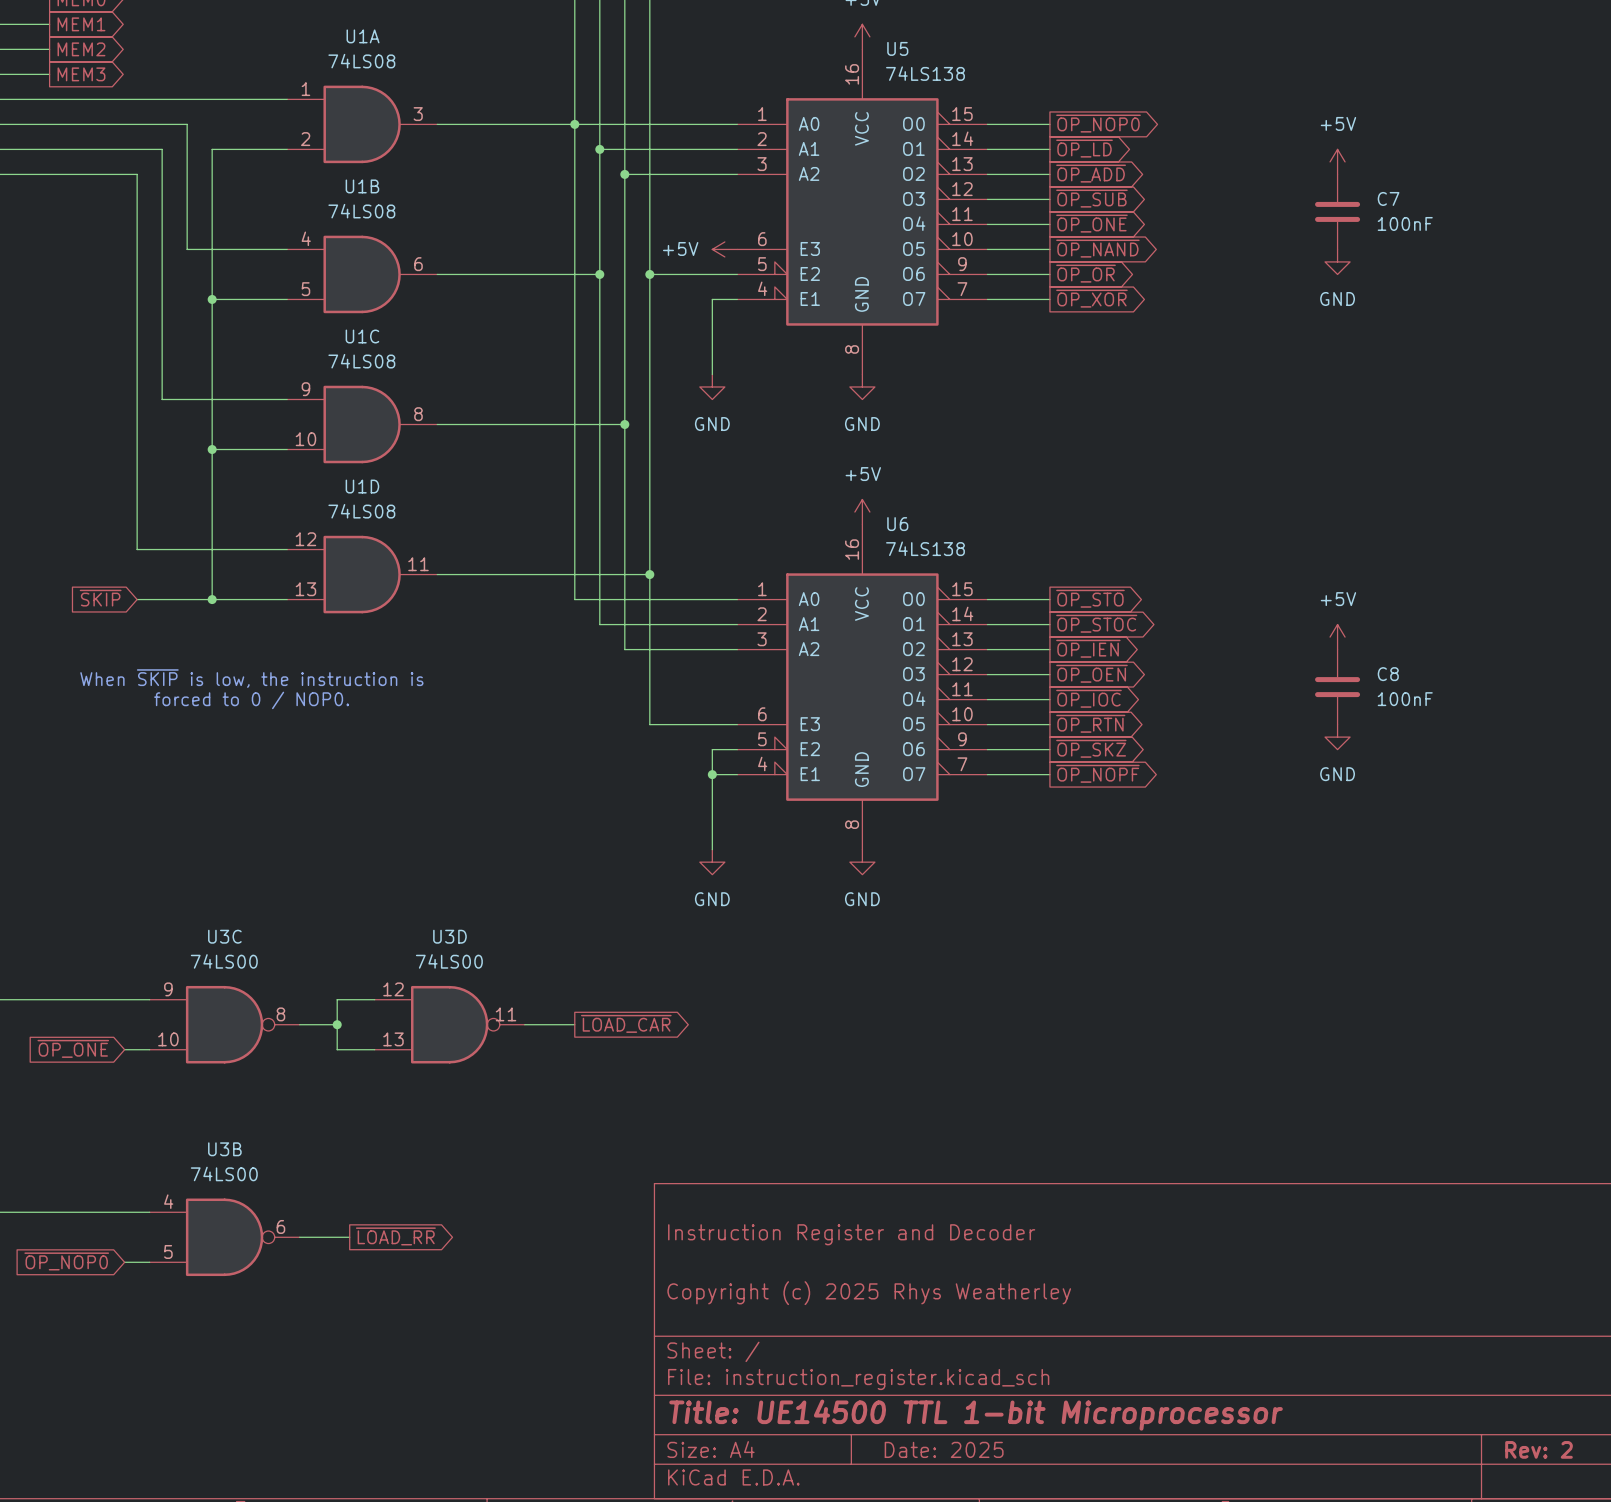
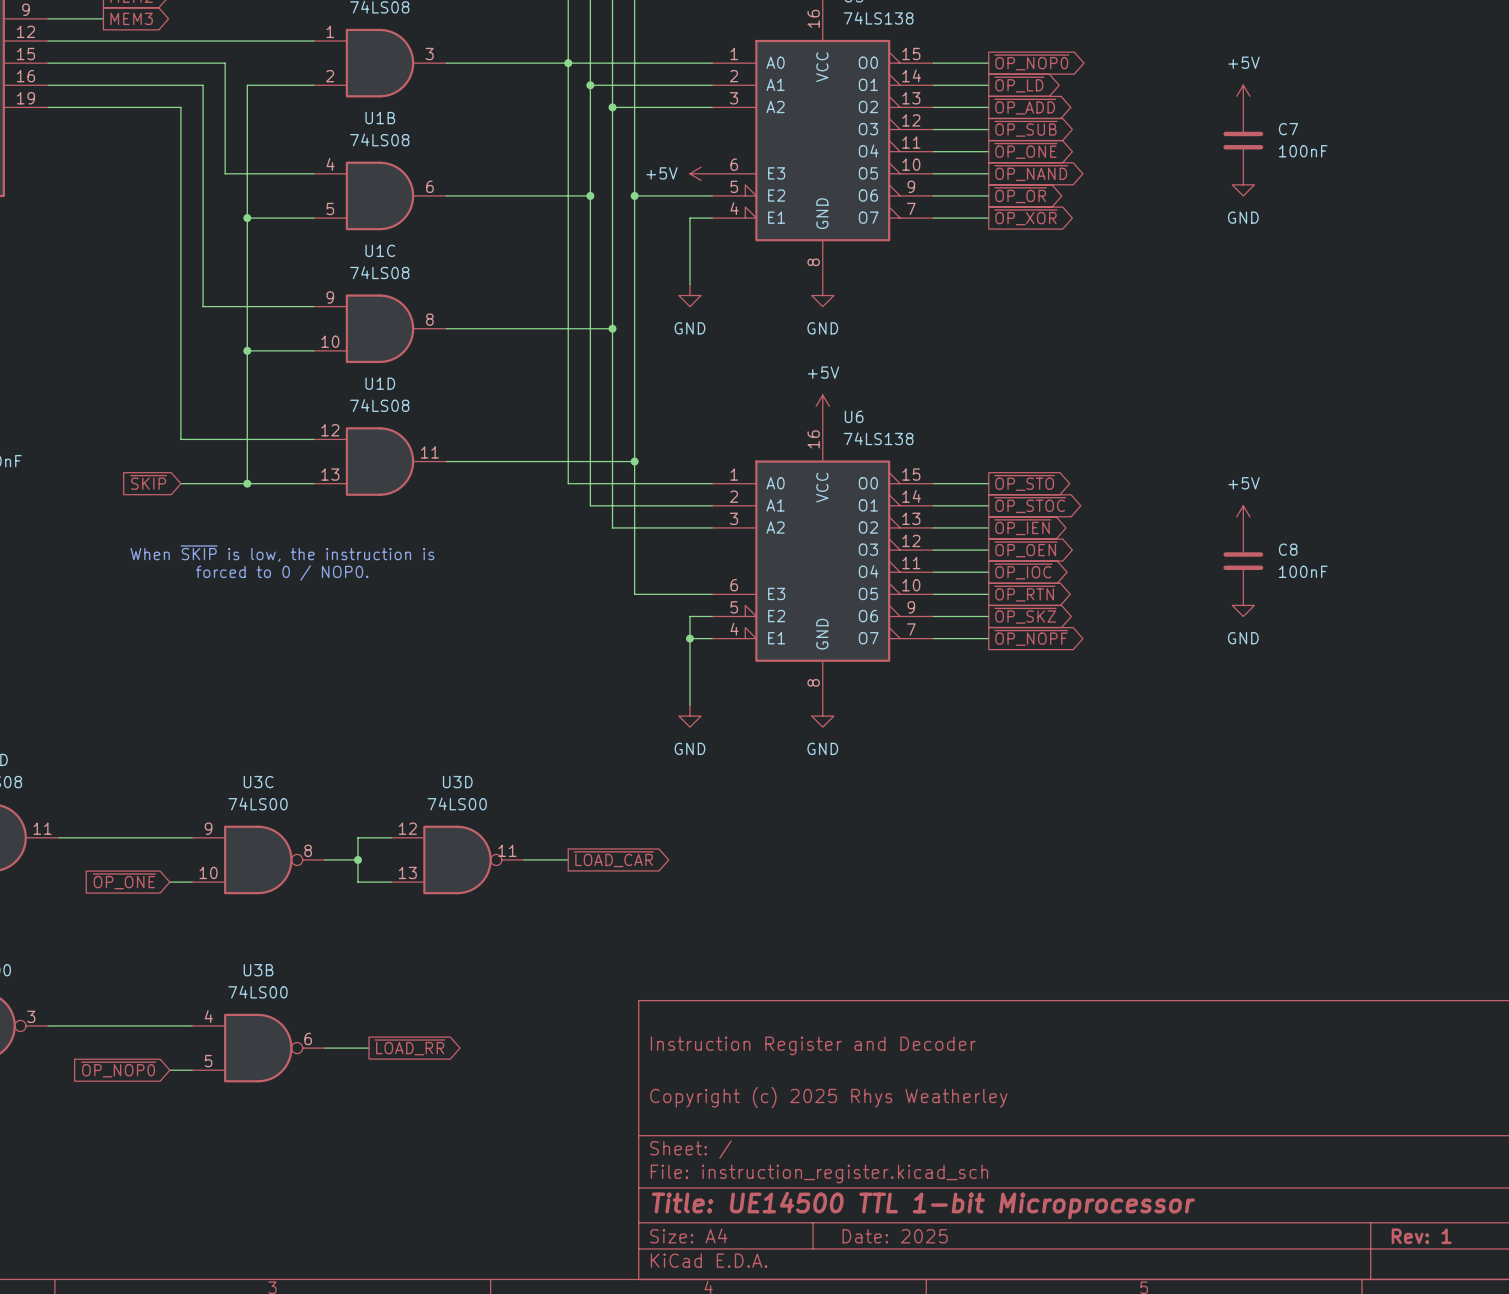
title block: Rev: 2 (1539, 1449) -> Rev: 1 (1421, 1236)

